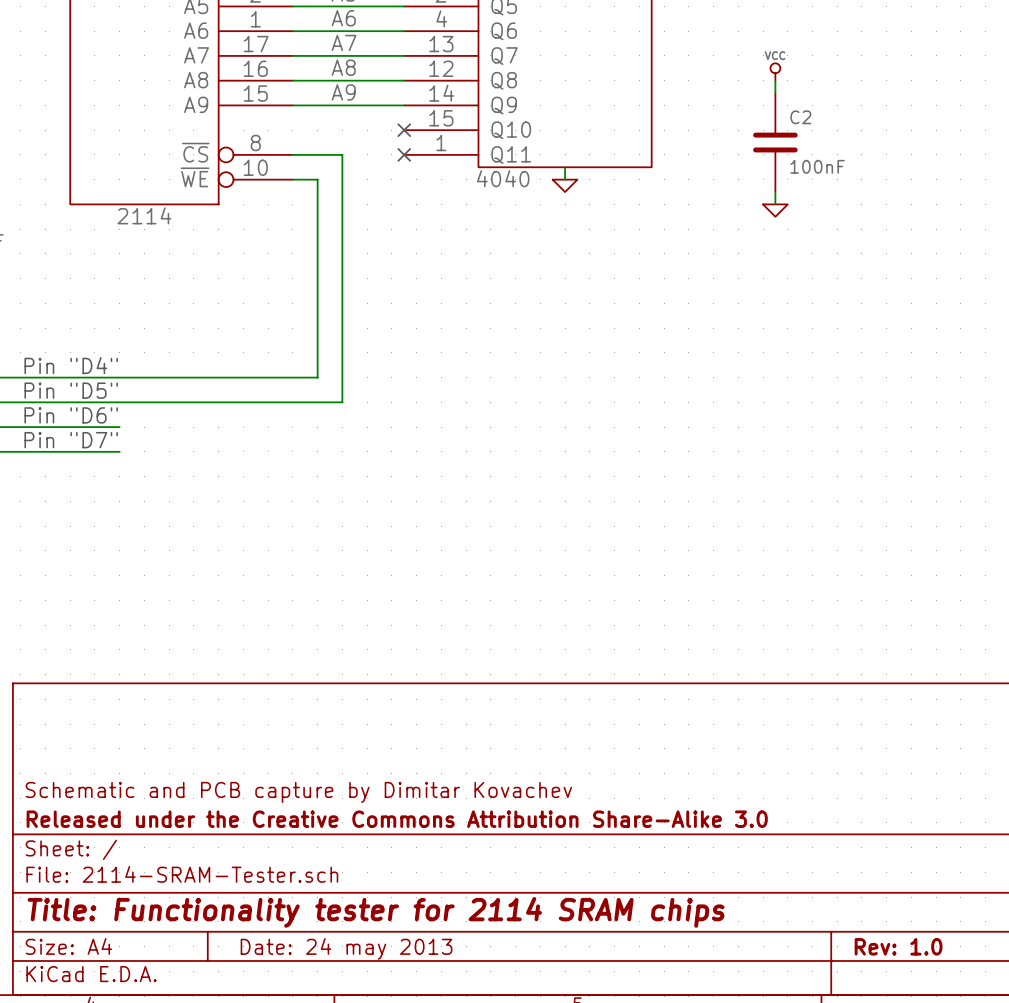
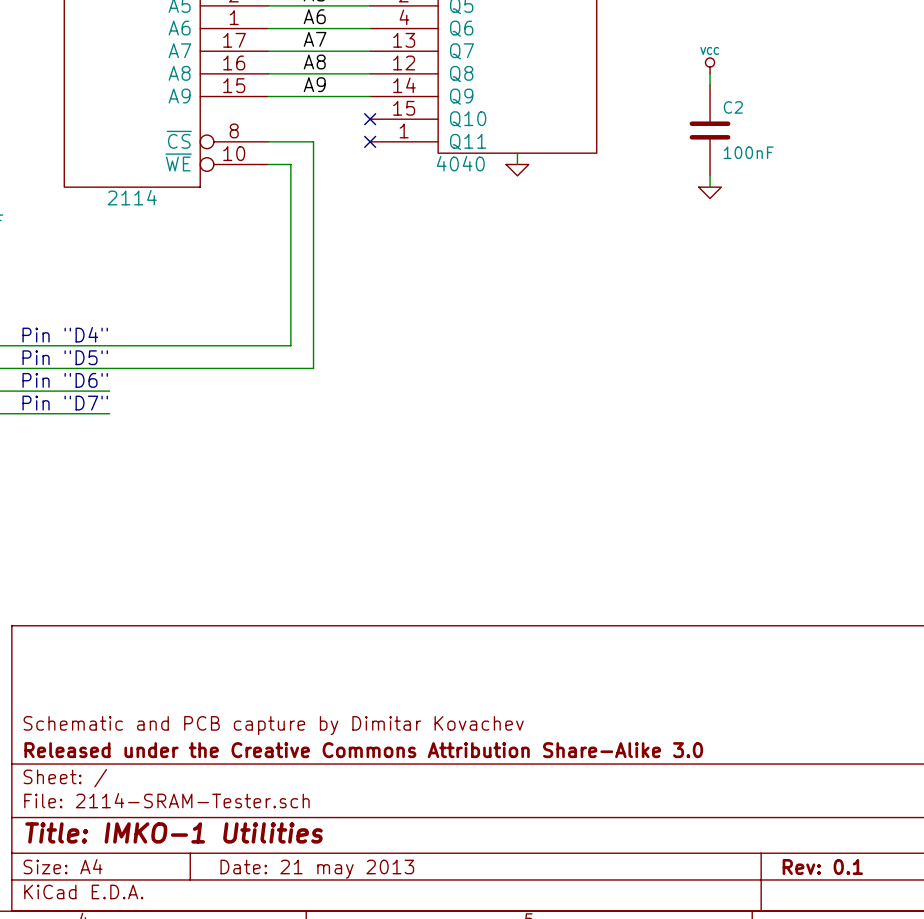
title block: Title: Functionality tester for 2114 SRAM chips (376, 912) -> Title: IMKO-1 Utilities (174, 832)
title block: Rev: 1.0 (898, 946) -> Rev: 0.1 (822, 867)
title block: Date: 24 may 2013 (346, 948) -> Date: 21 may 2013 (317, 869)

